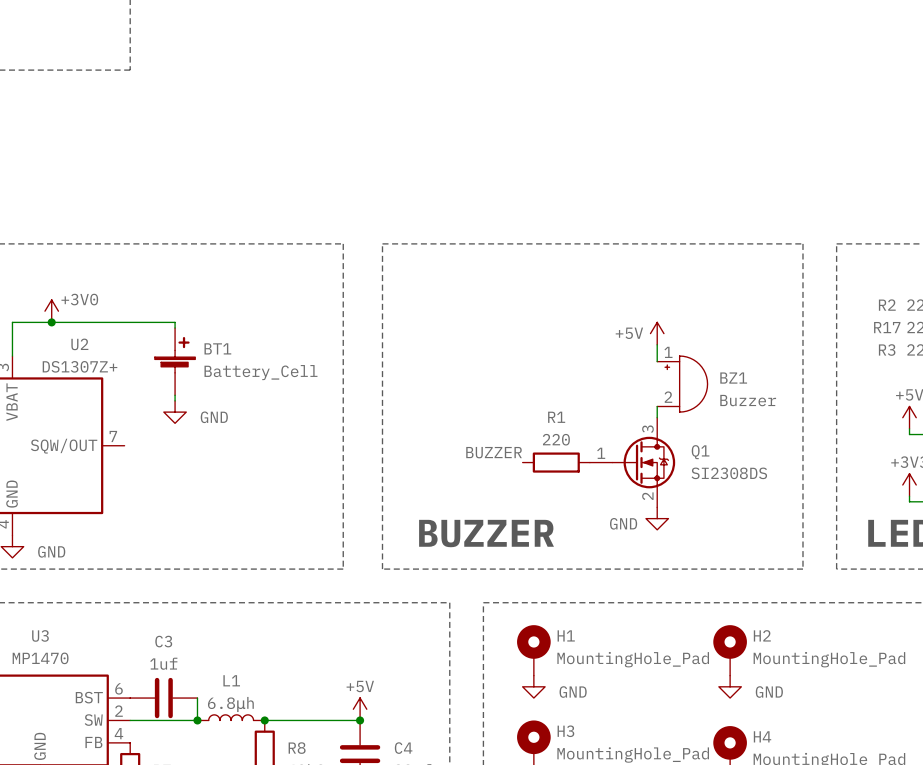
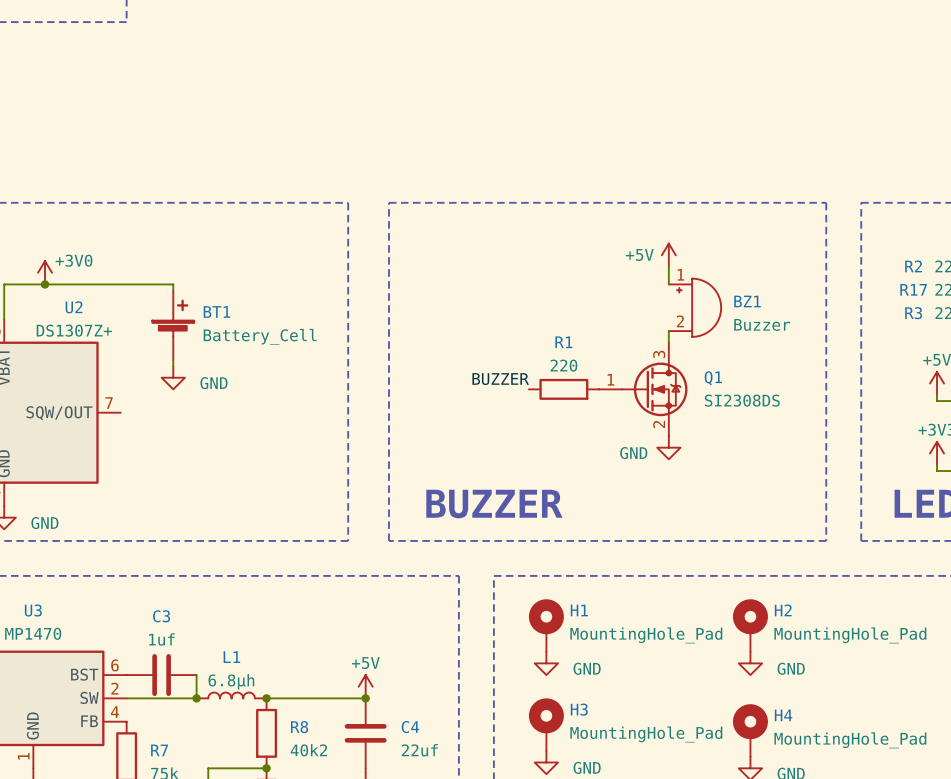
power symbol position: +5V (657, 333) -> +5V (668, 255)
wire: (657, 344) (657, 361) -> (668, 266) (668, 284)
BZ1 position: (682, 384) -> (695, 307)
wire: (657, 406) (657, 417) -> (668, 331) (668, 342)
label position: BUZZER (494, 452) -> BUZZER (500, 379)
R1 position: (556, 462) -> (563, 389)
Q1 position: (632, 462) -> (643, 389)
power symbol position: GND (657, 518) -> GND (668, 447)

